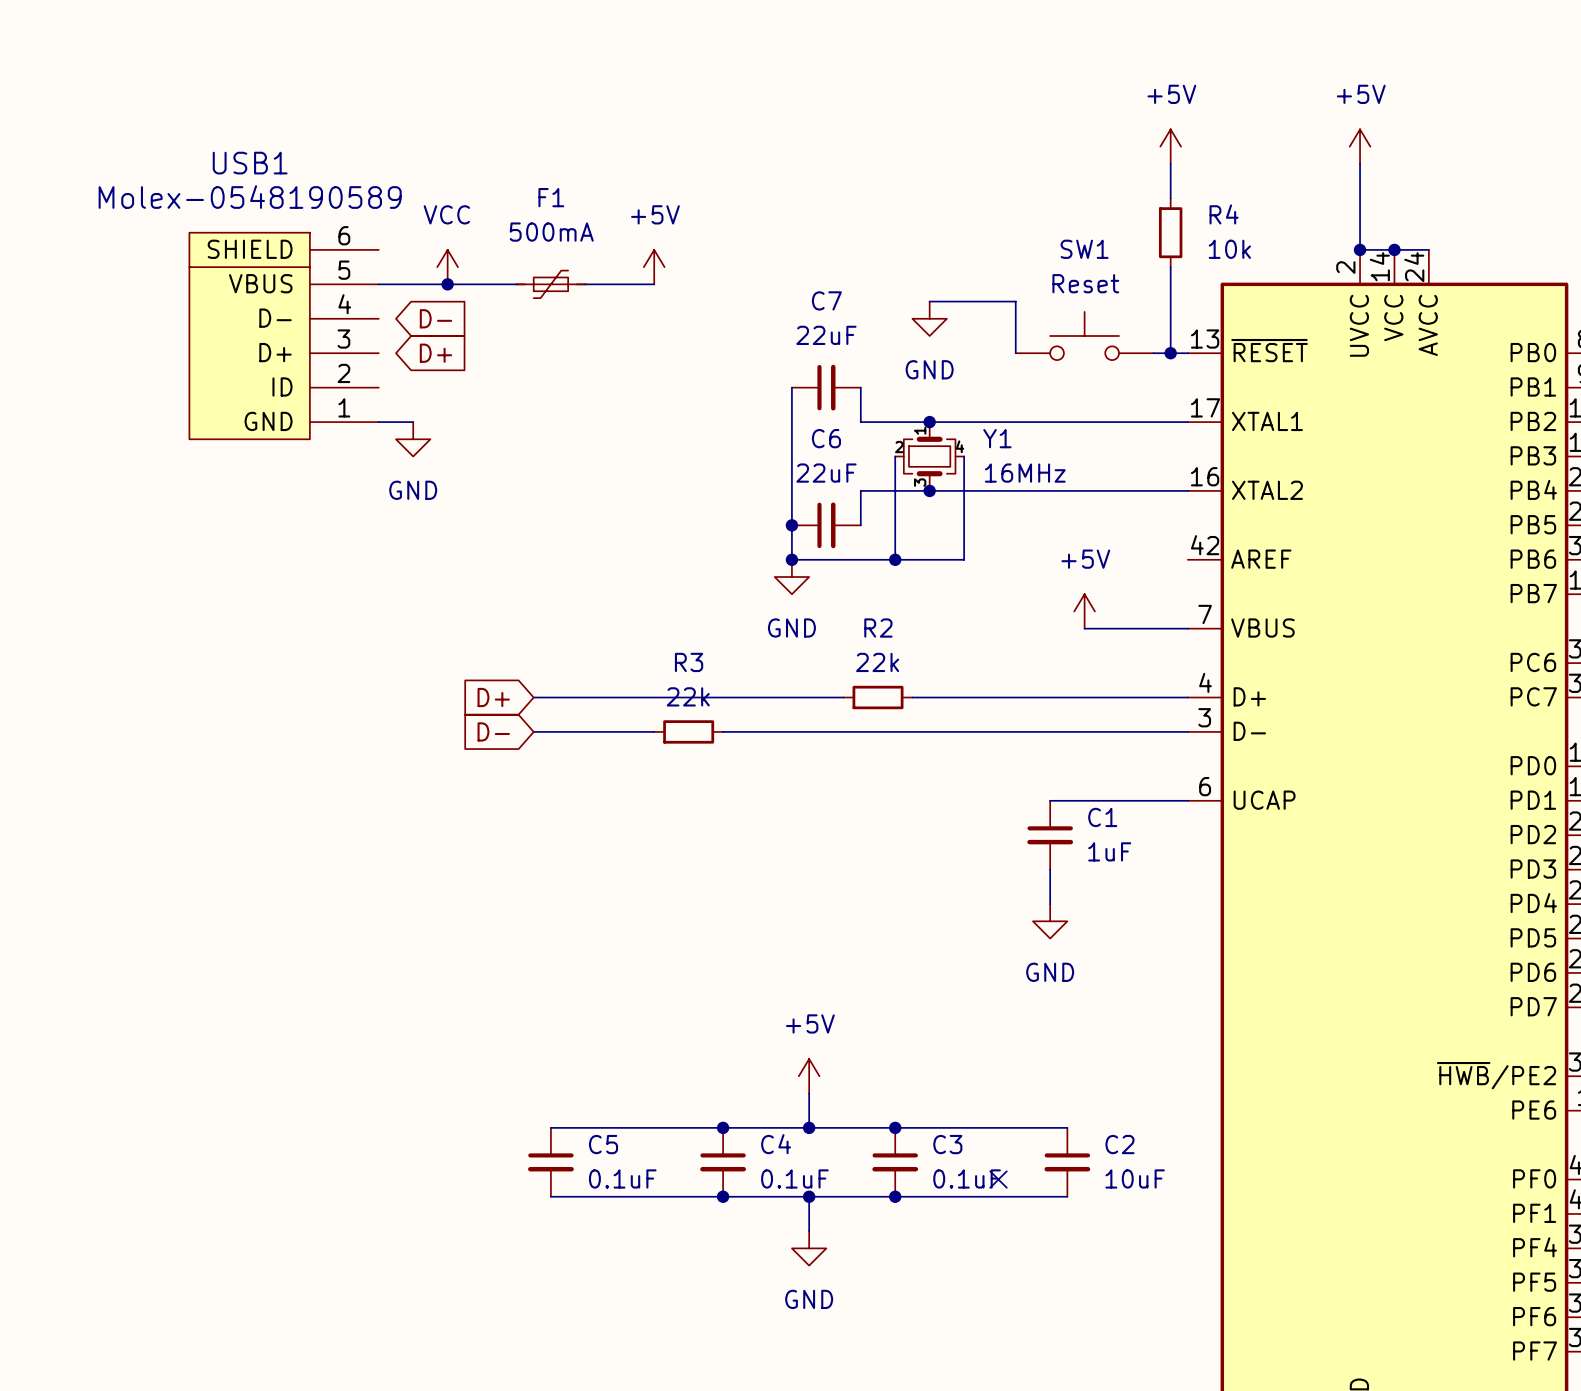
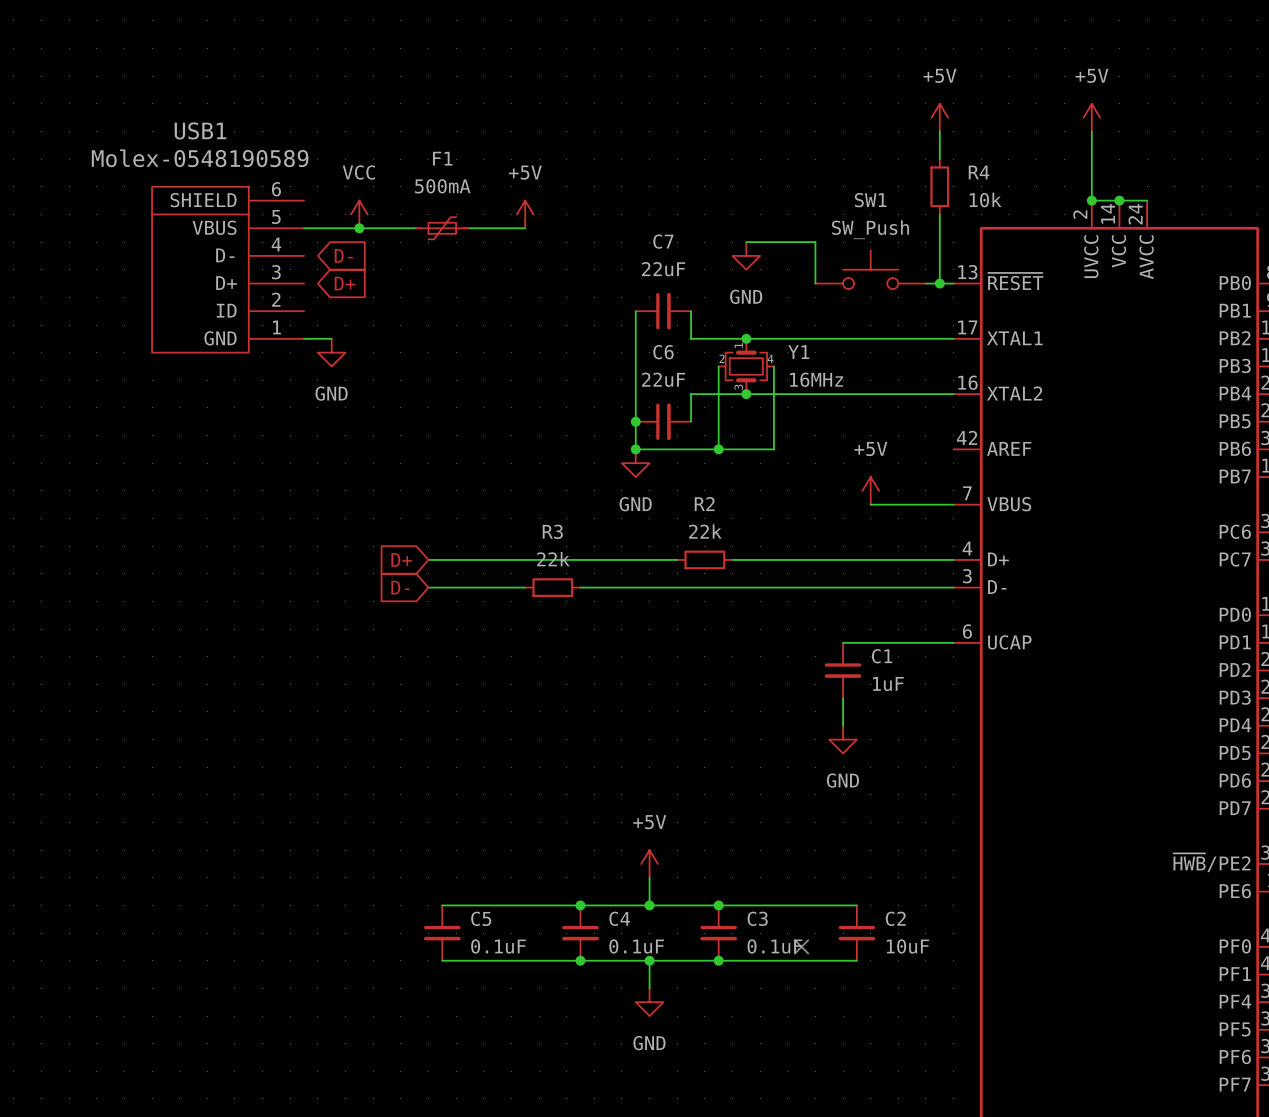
SW1 value: Reset (1085, 283) -> SW_Push (870, 229)

